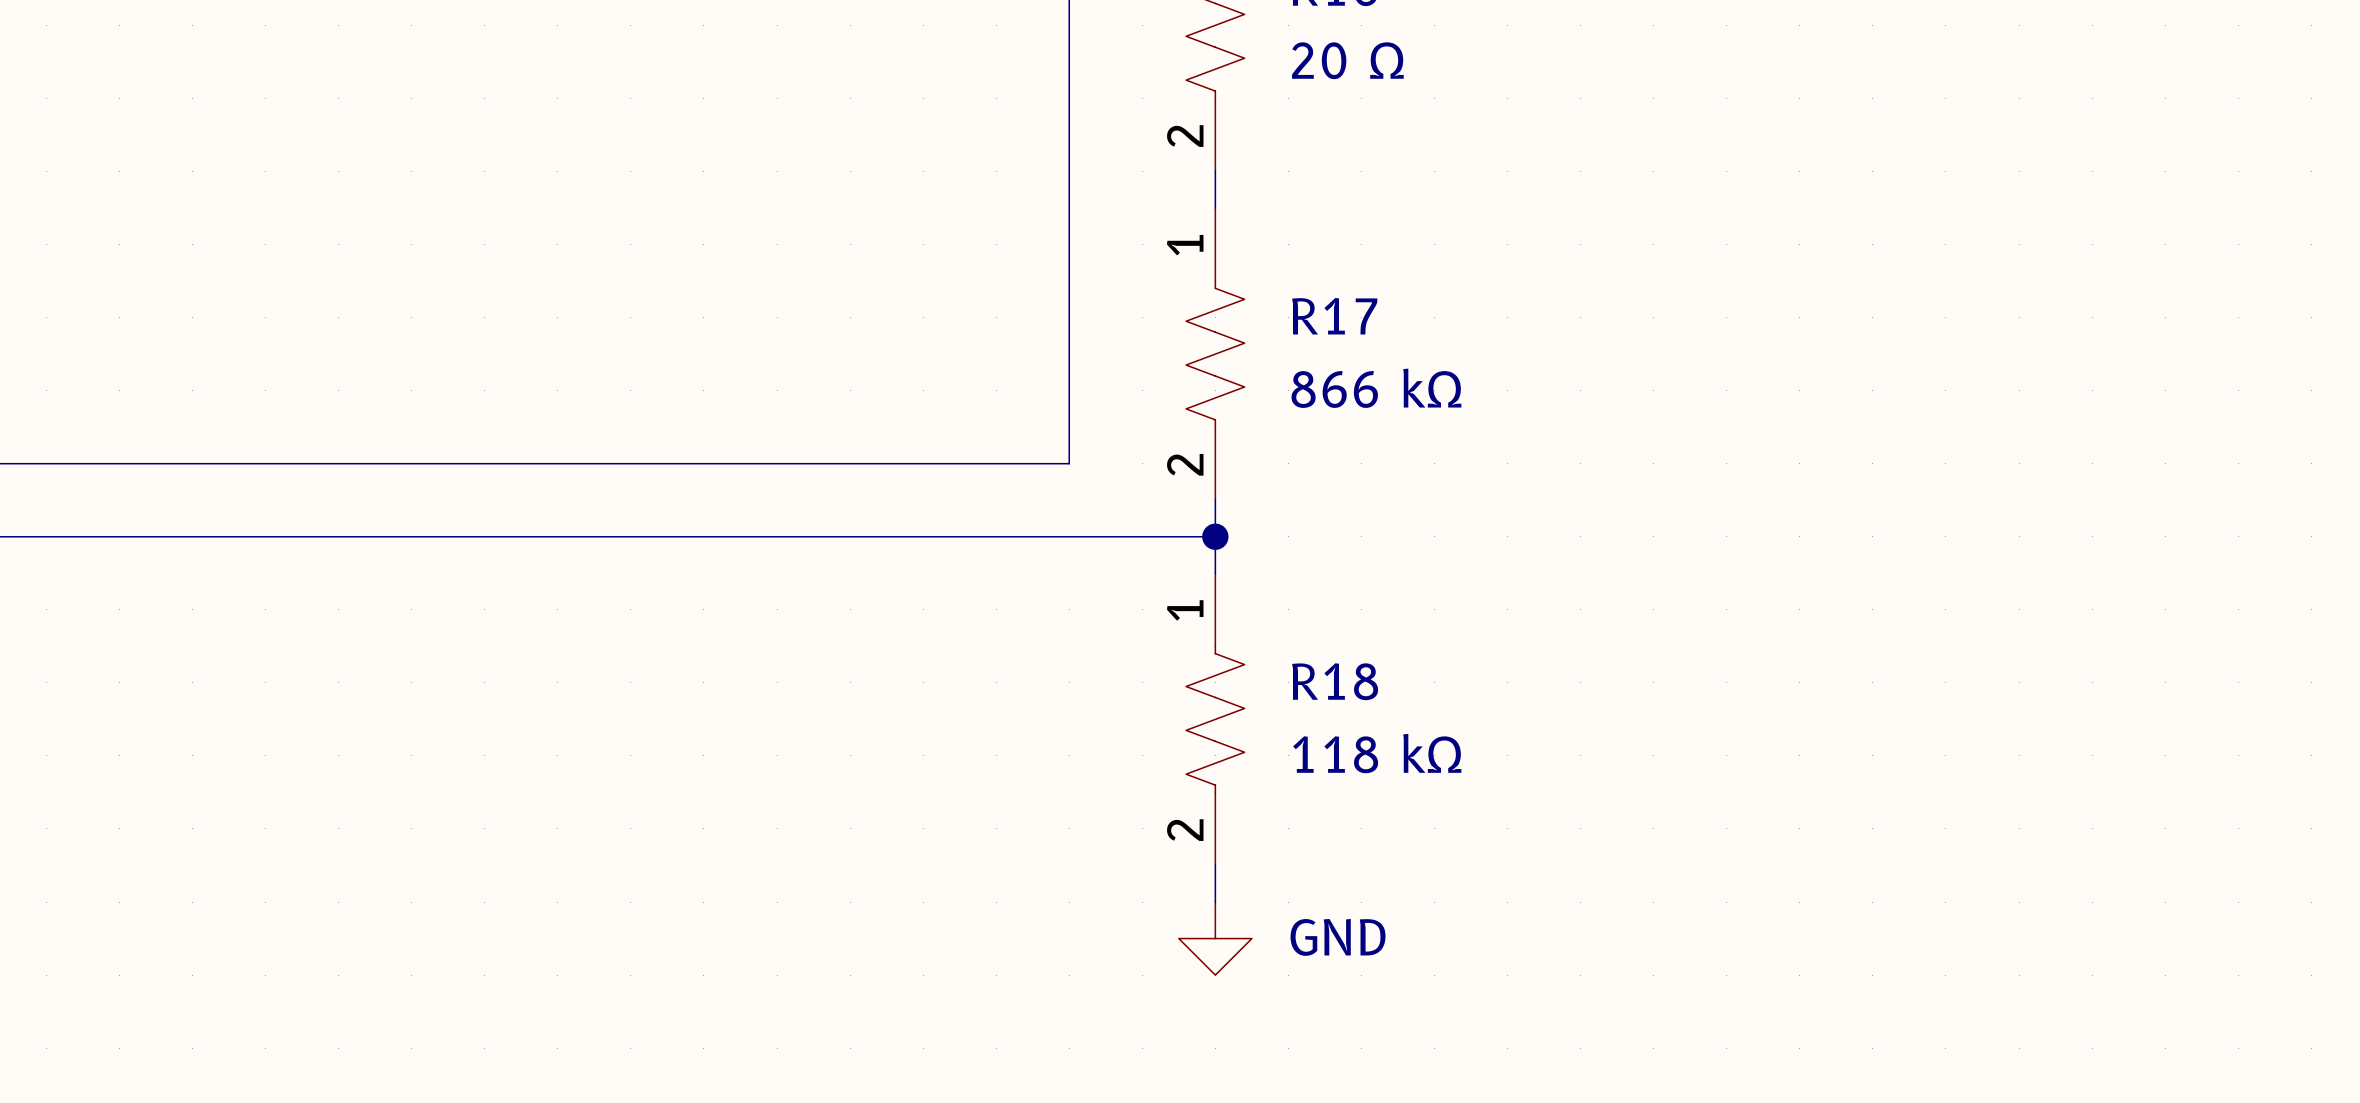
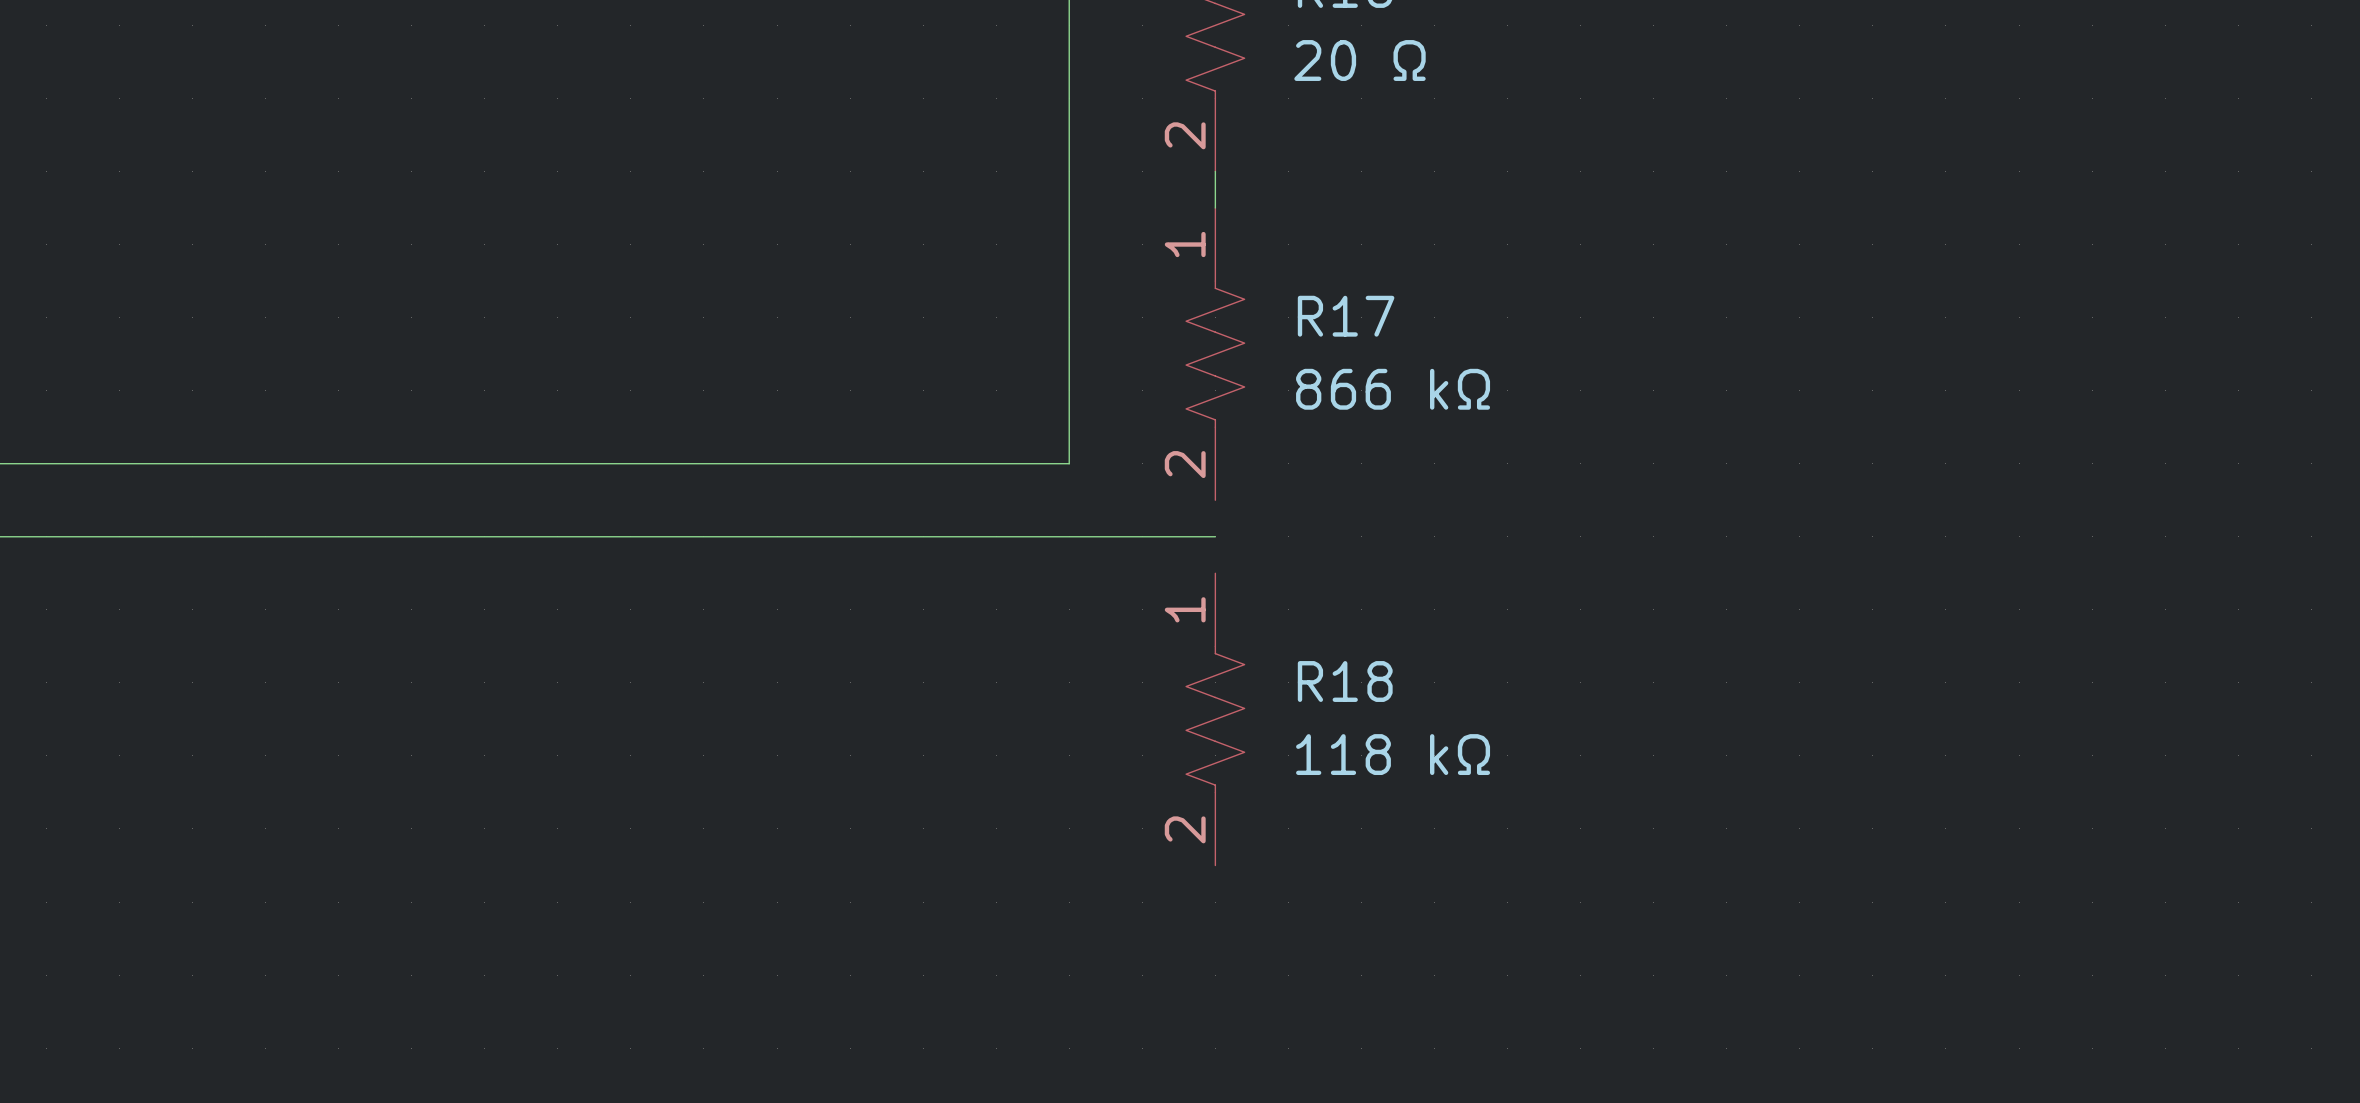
wire: (1215, 500) (1215, 573) -> none
junction: (1215, 536) -> none
wire: (1215, 865) (1215, 902) -> none
power symbol: GND (1215, 938) -> none

